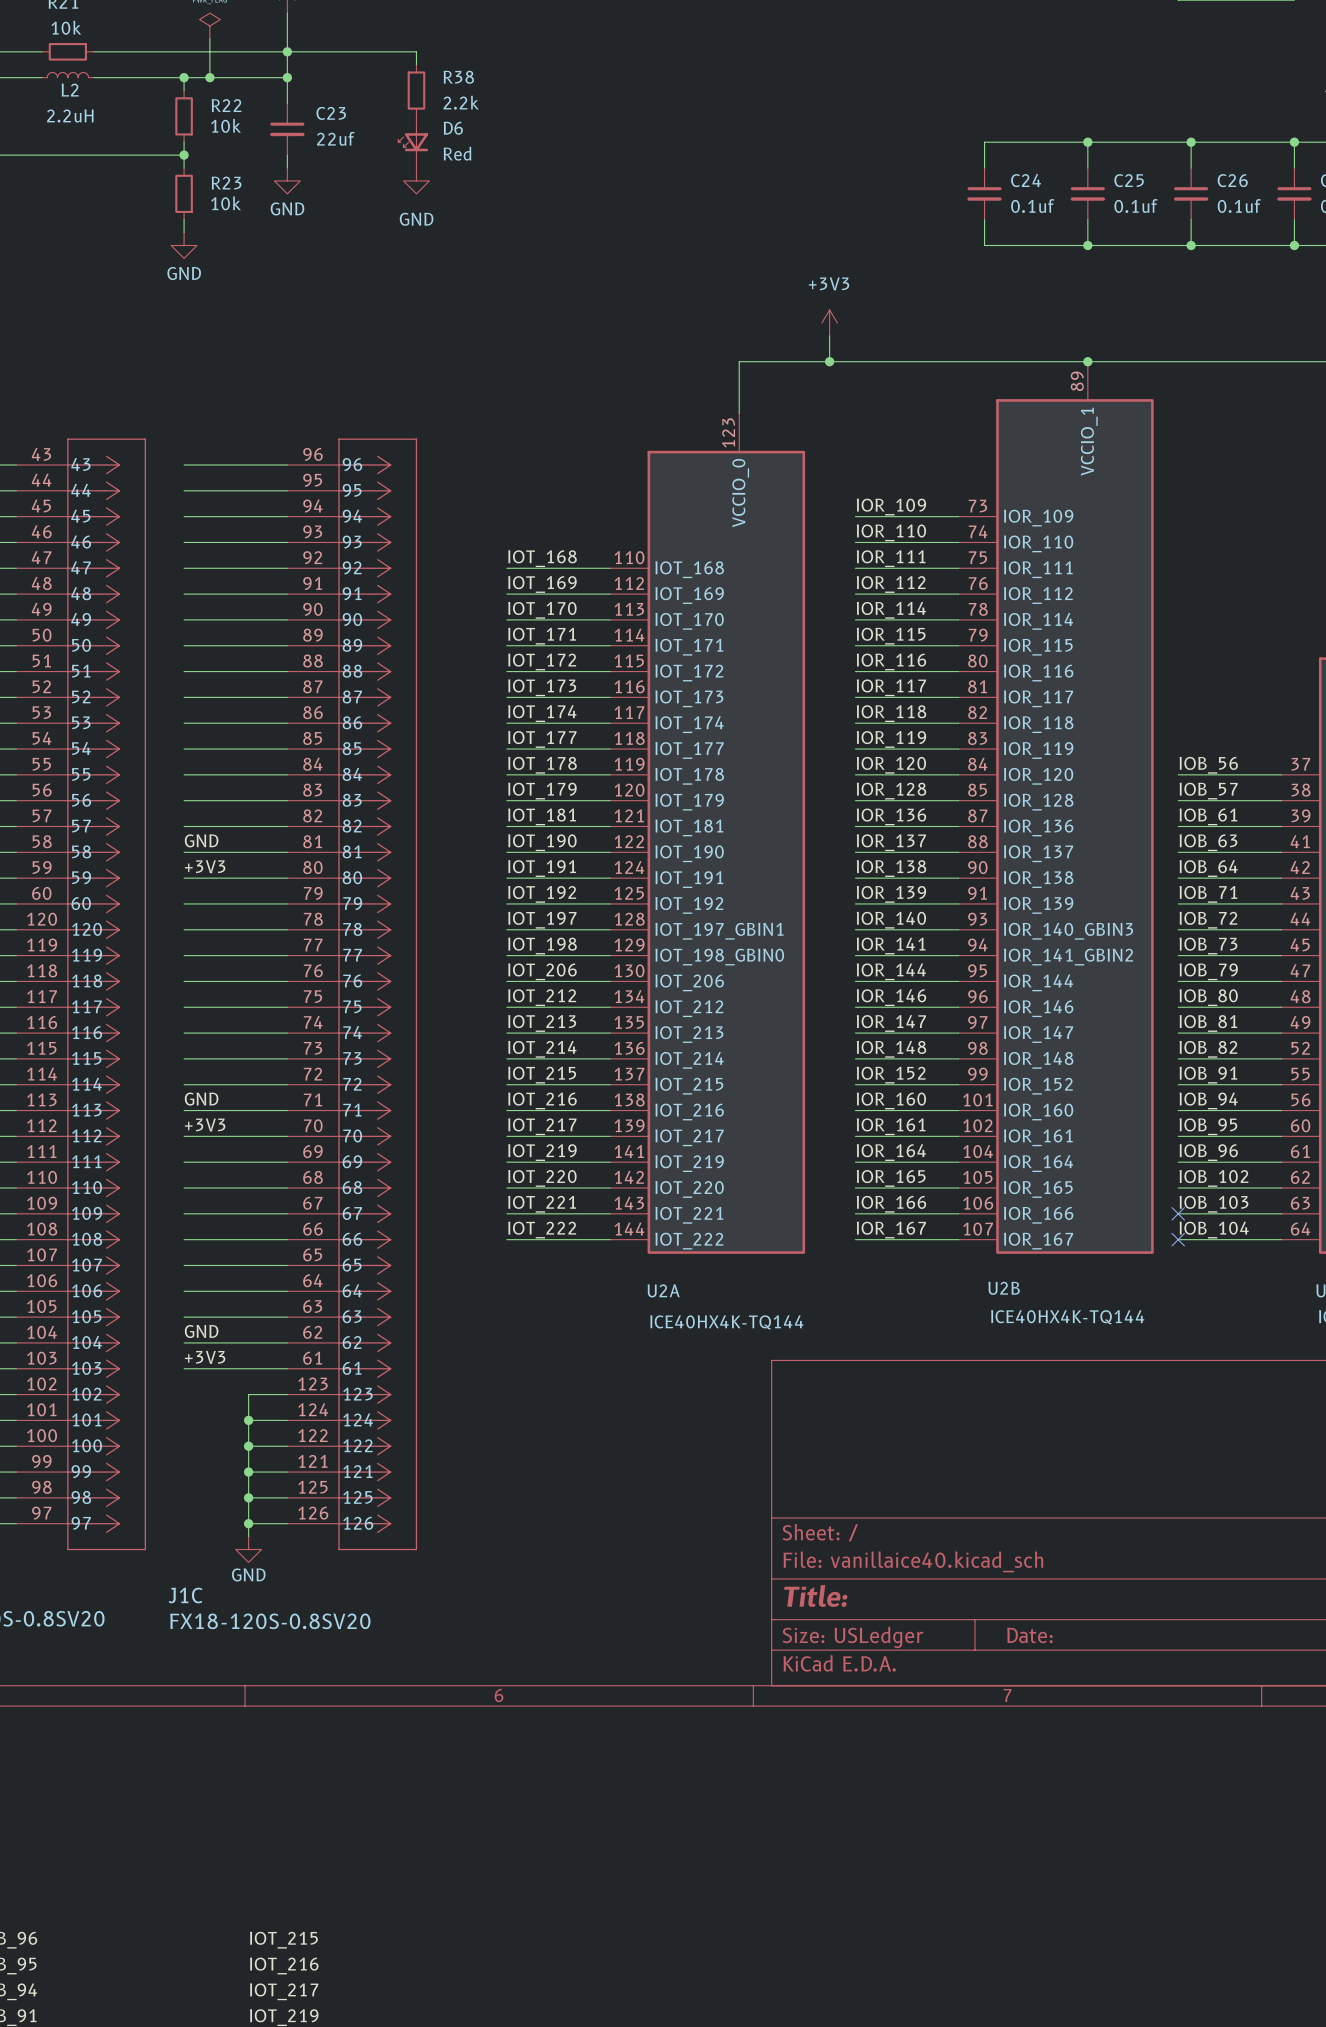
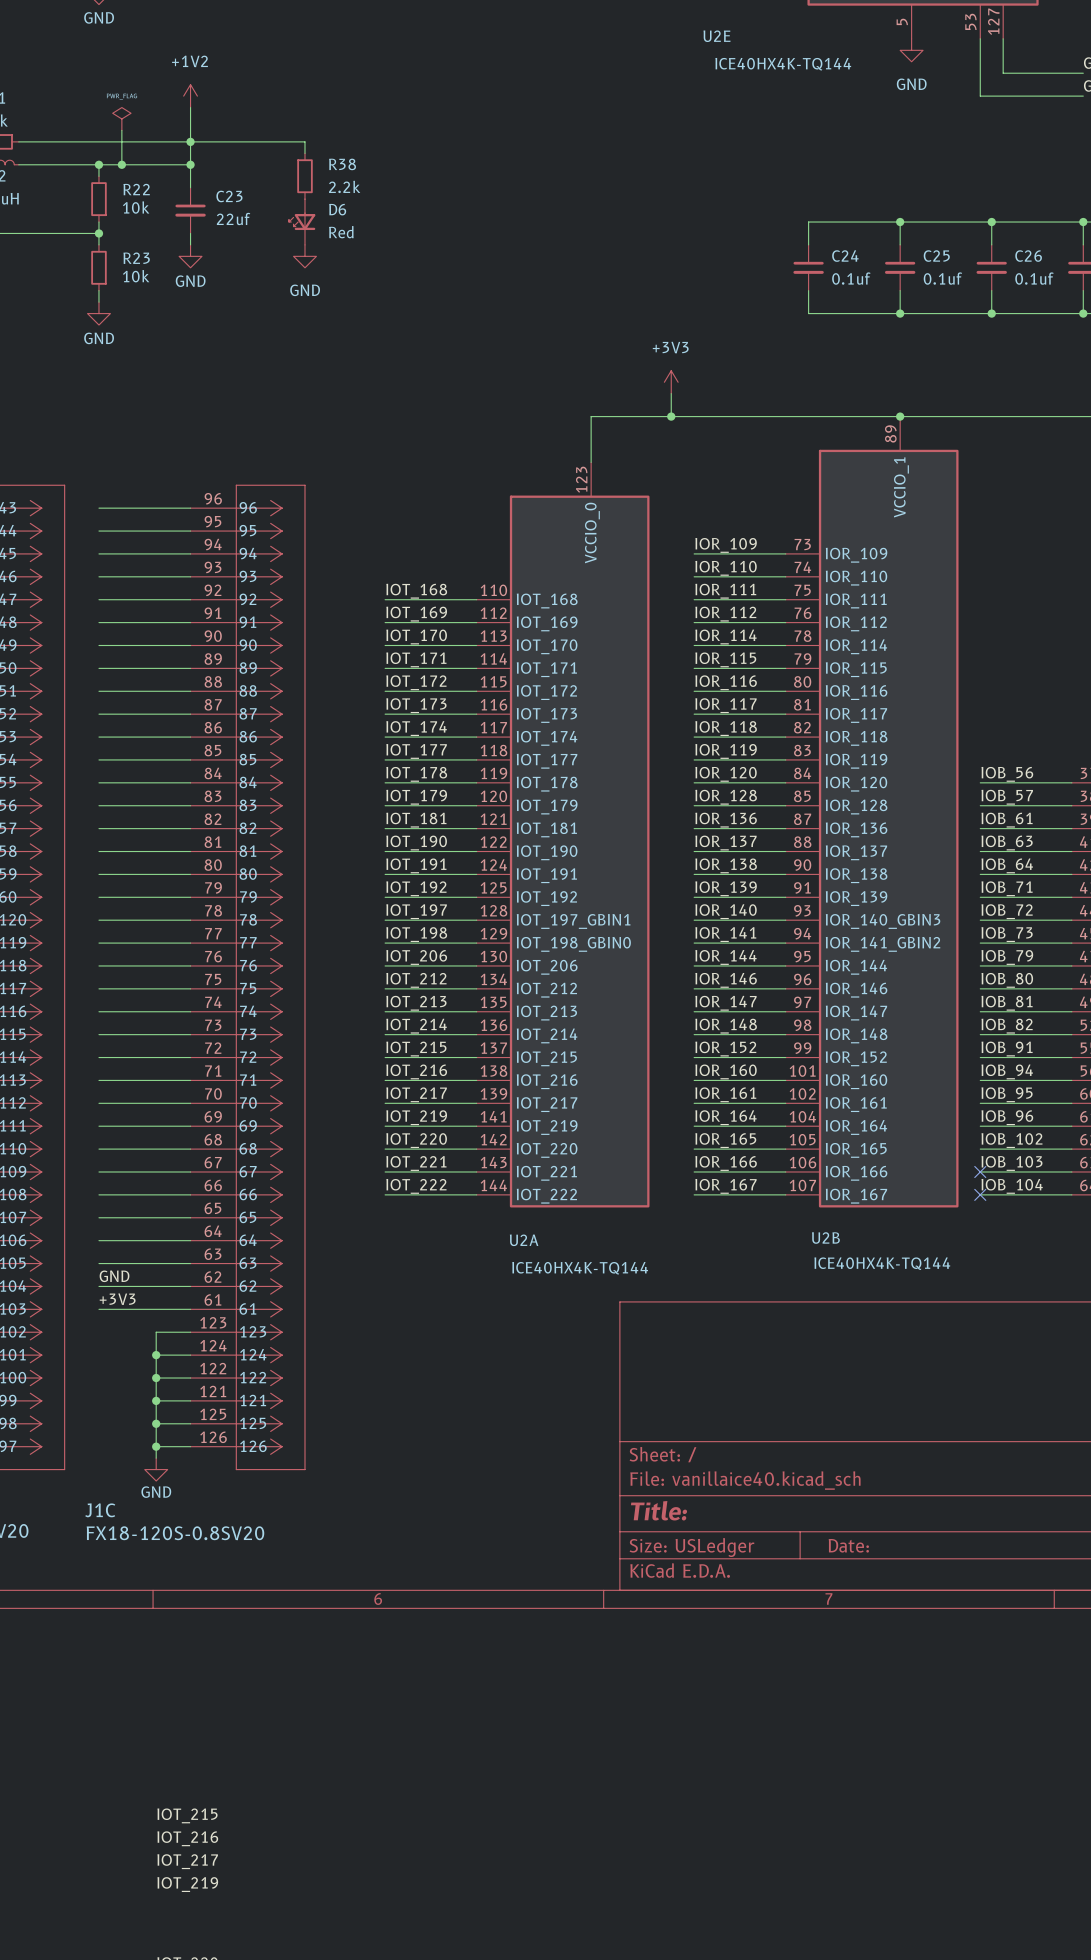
label: GND (201, 840) -> none
label: +3V3 (205, 866) -> none
label: GND (201, 1099) -> none
label: +3V3 (205, 1124) -> none

